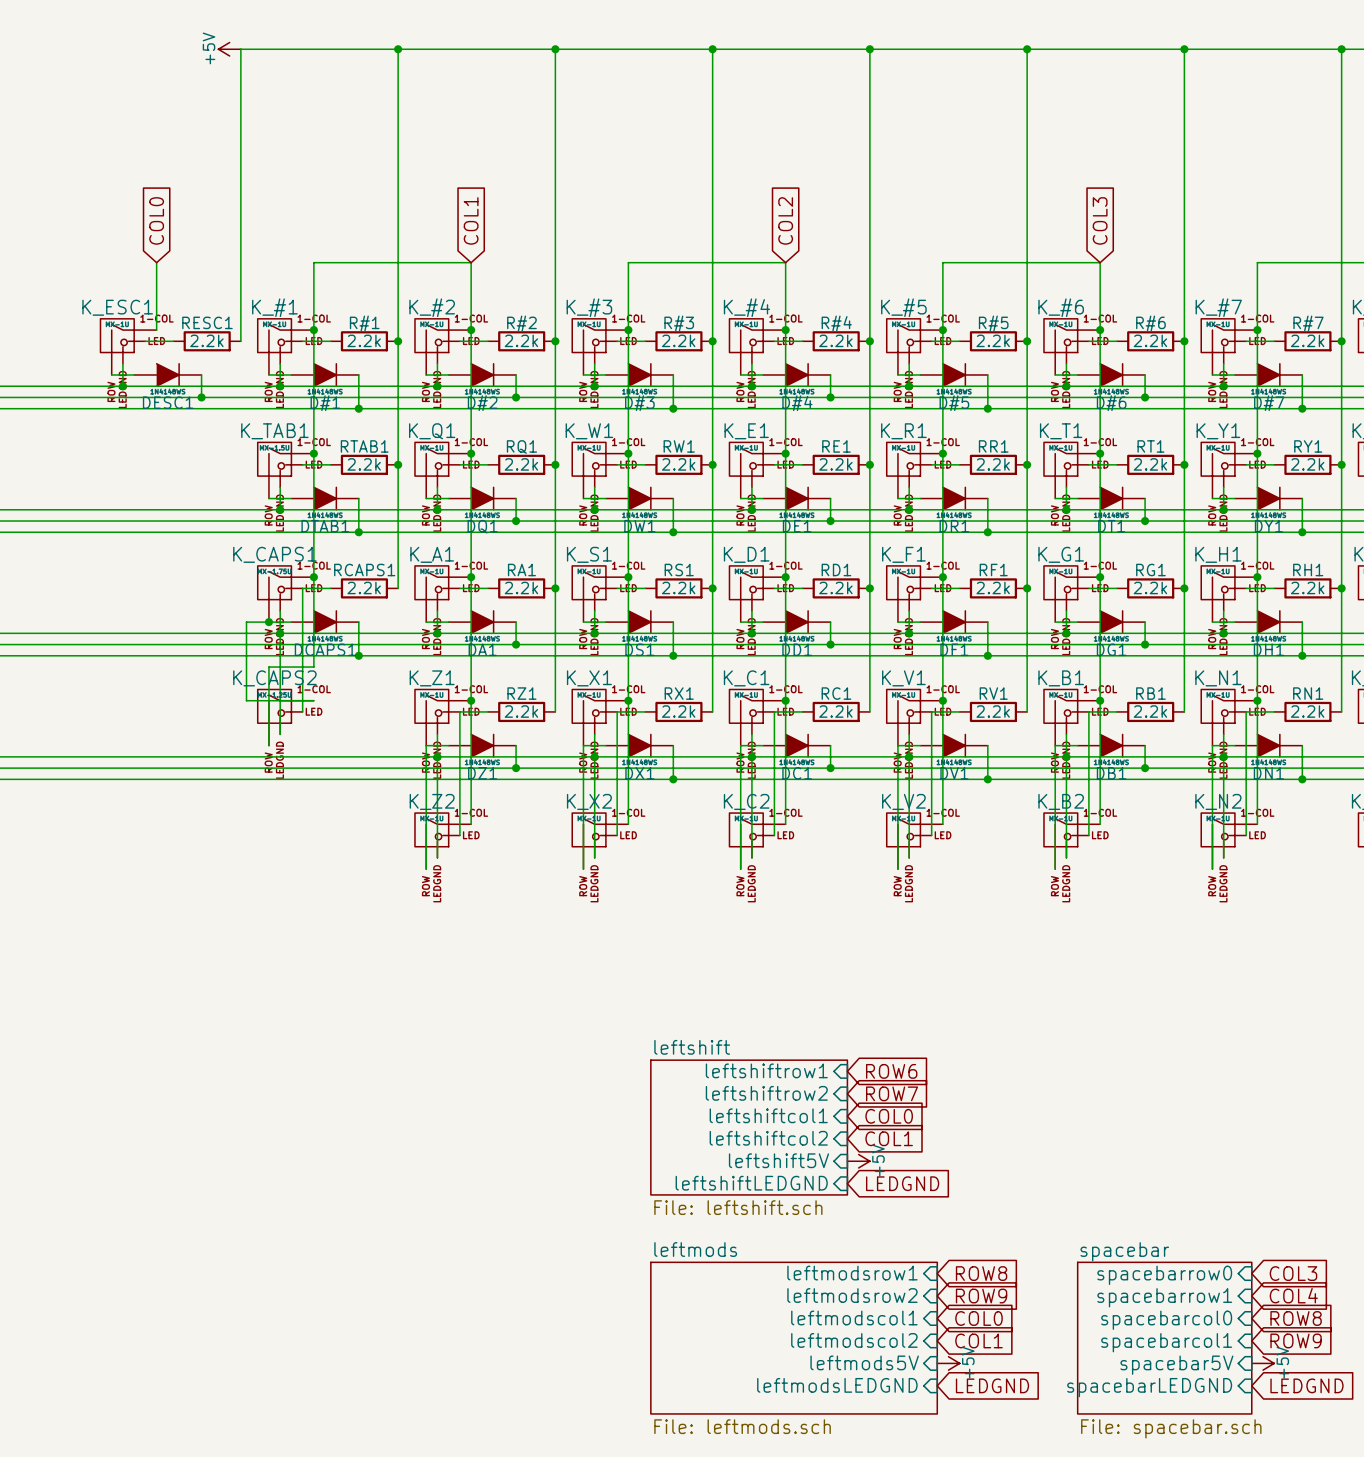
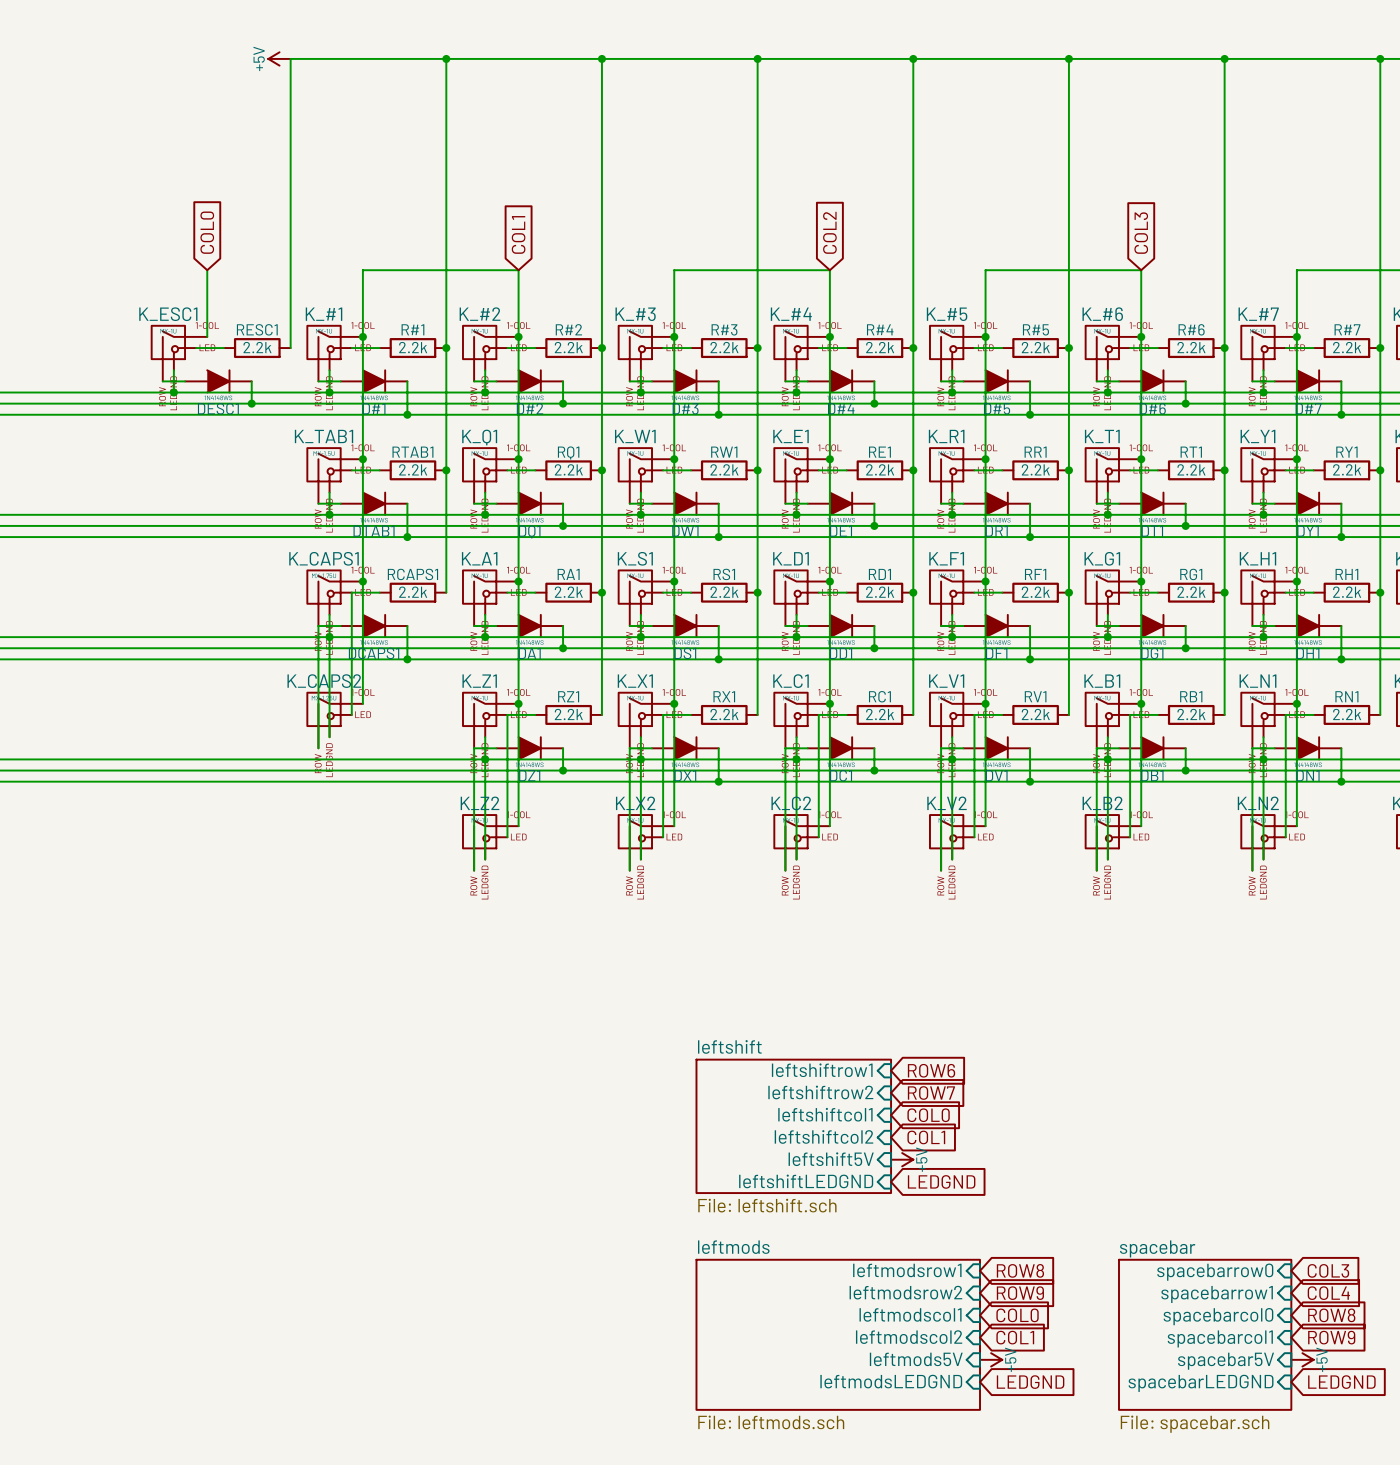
wire: (268, 622) (246, 622) (246, 700) (313, 700) -> (318, 626) (318, 670)
junction: (268, 622) -> none
wire: (268, 667) (313, 667) -> (362, 703) (362, 670)

